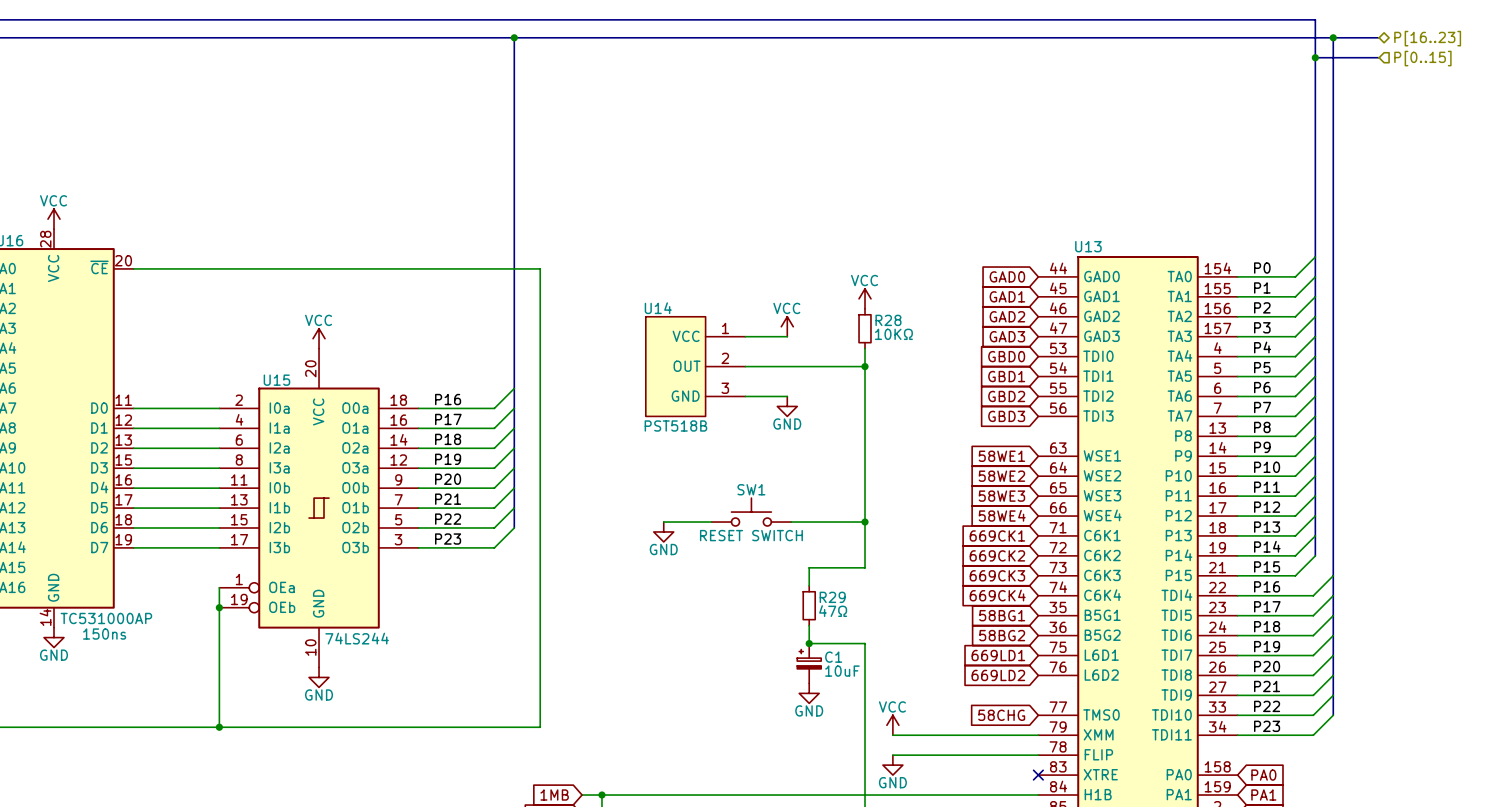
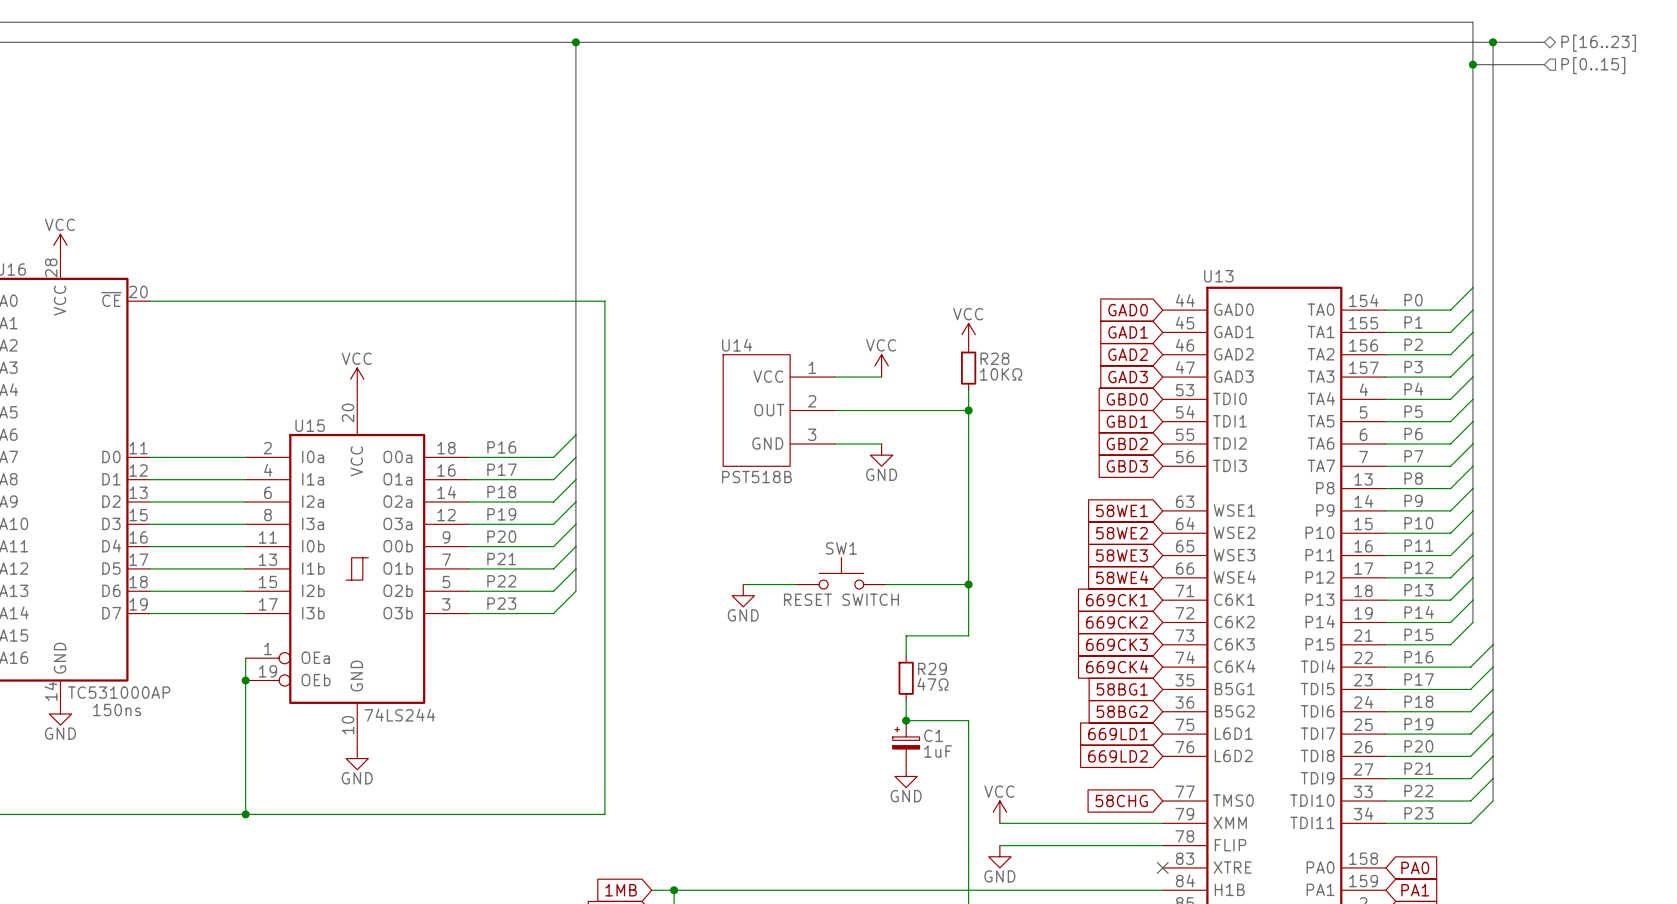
C1 value: 10uF (842, 671) -> 1uF (938, 751)

